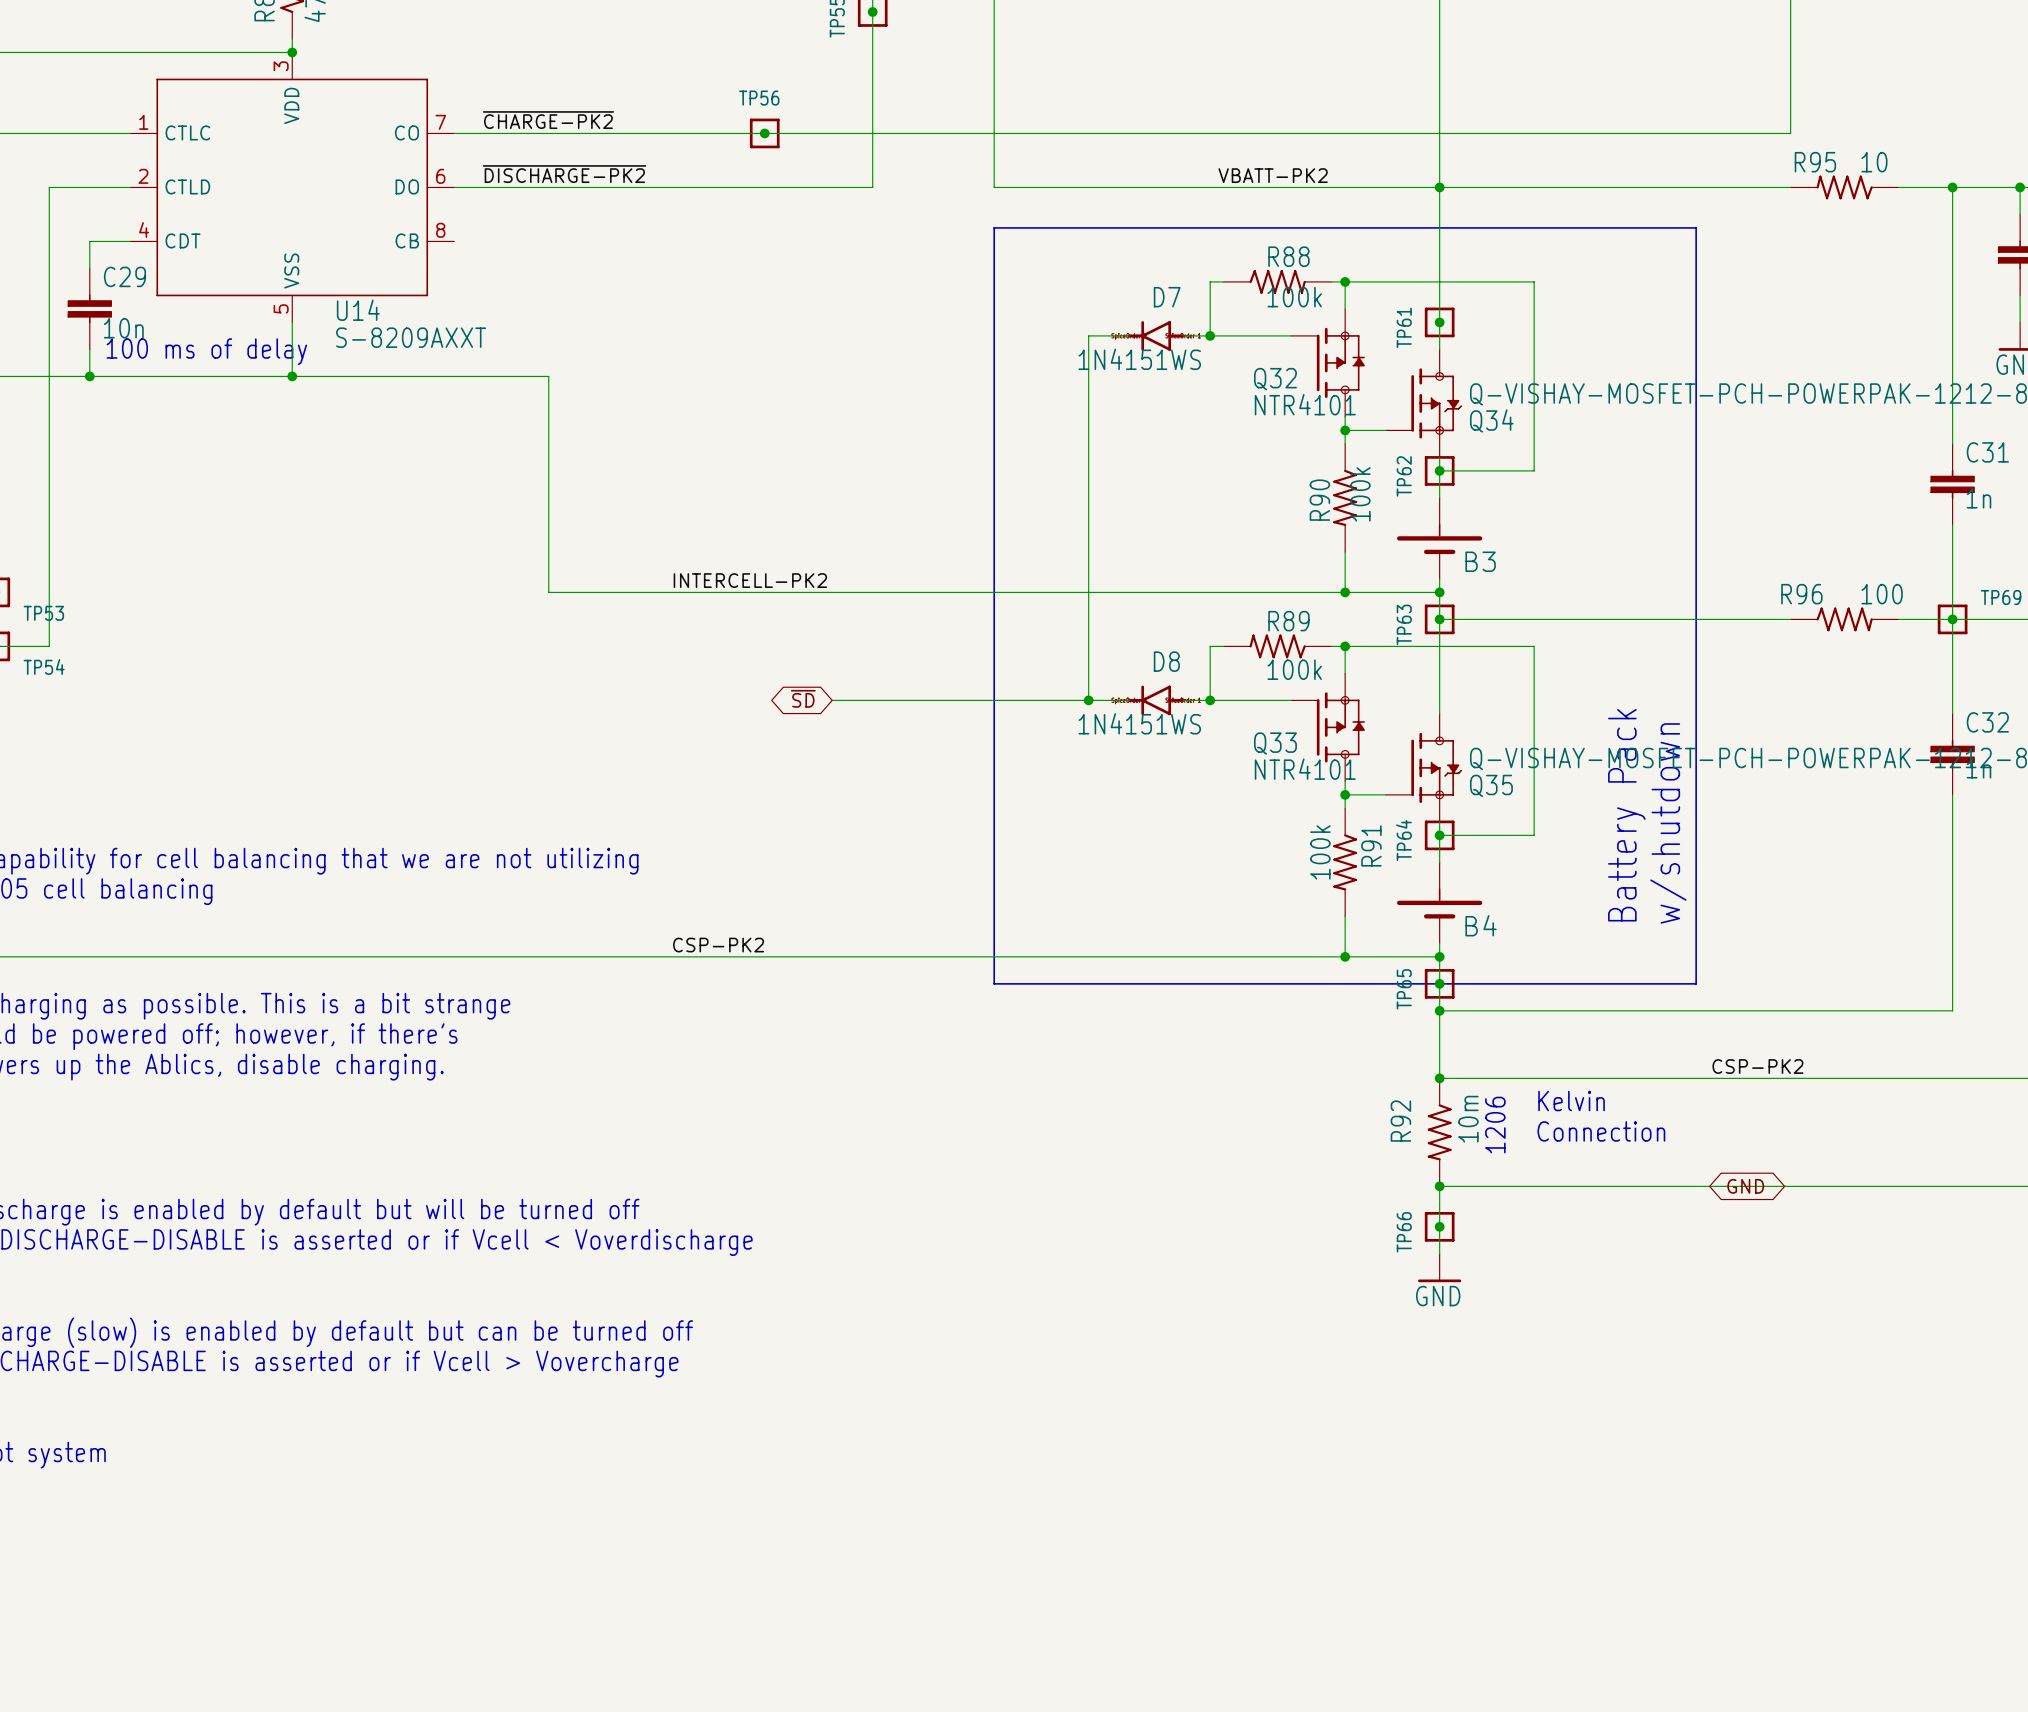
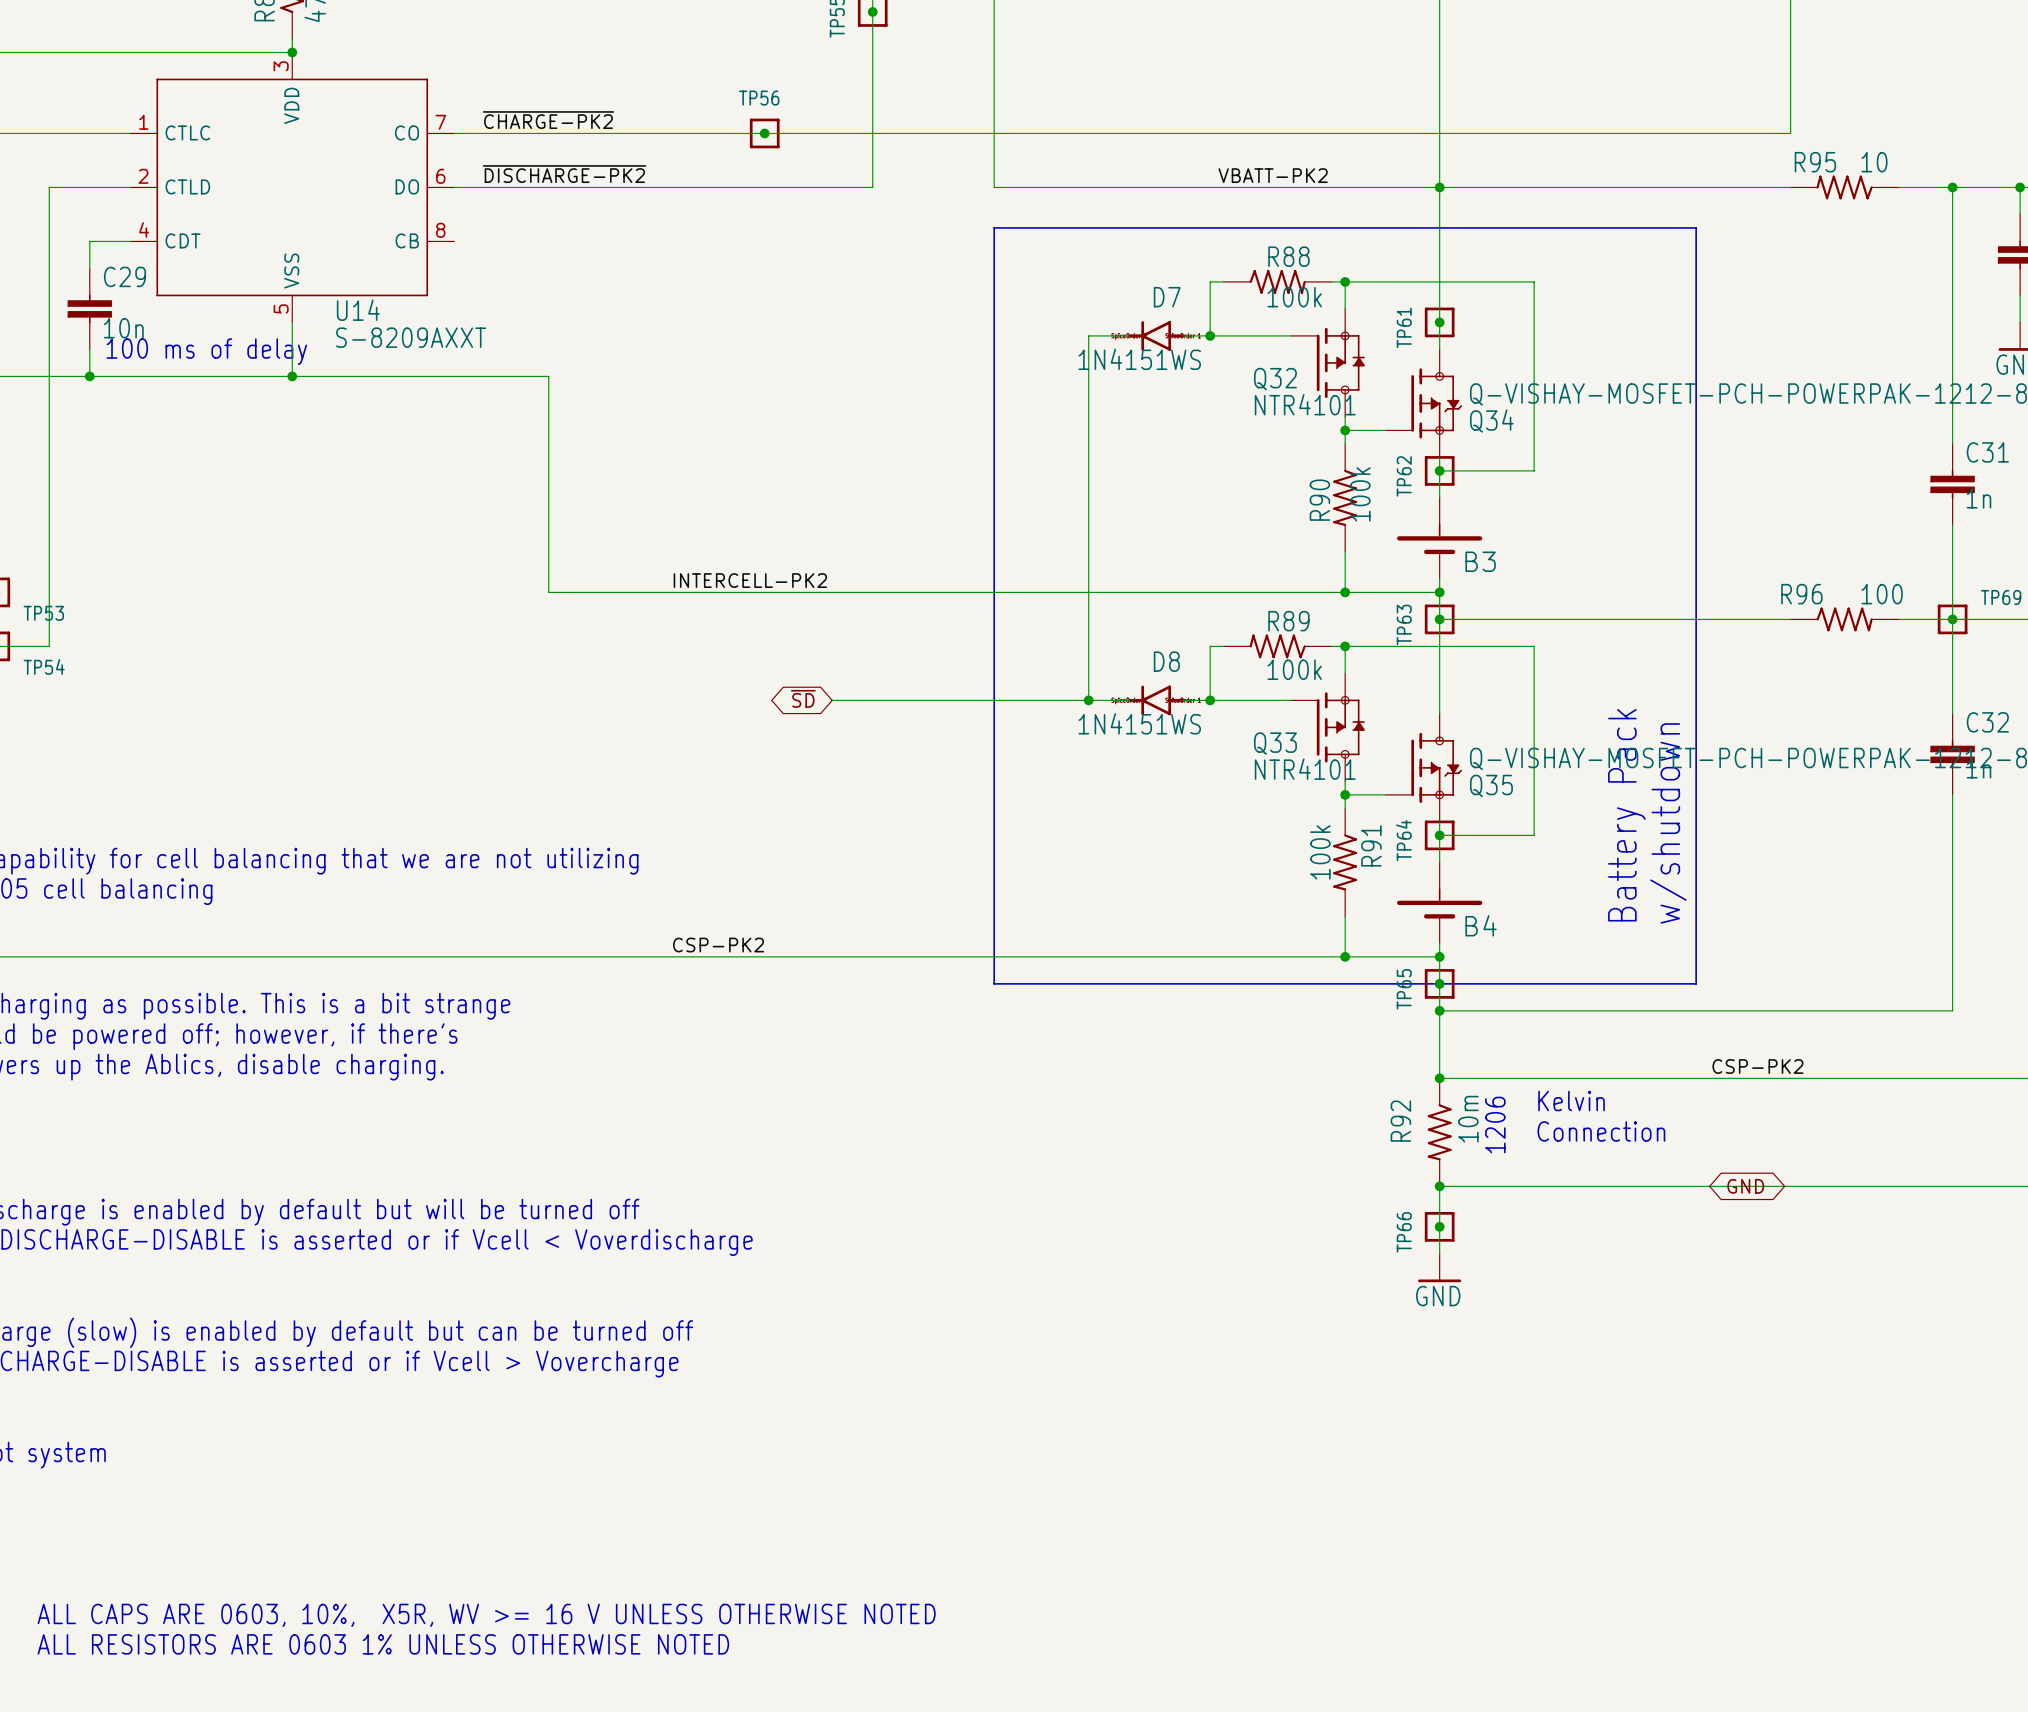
text: none -> ALL CAPS ARE 0603, 10%, X5R, WV >= 16 V UNLESS OTHERWISE NOTED (486, 1615)
text: none -> ALL RESISTORS ARE 0603 1% UNLESS OTHERWISE NOTED (383, 1644)

